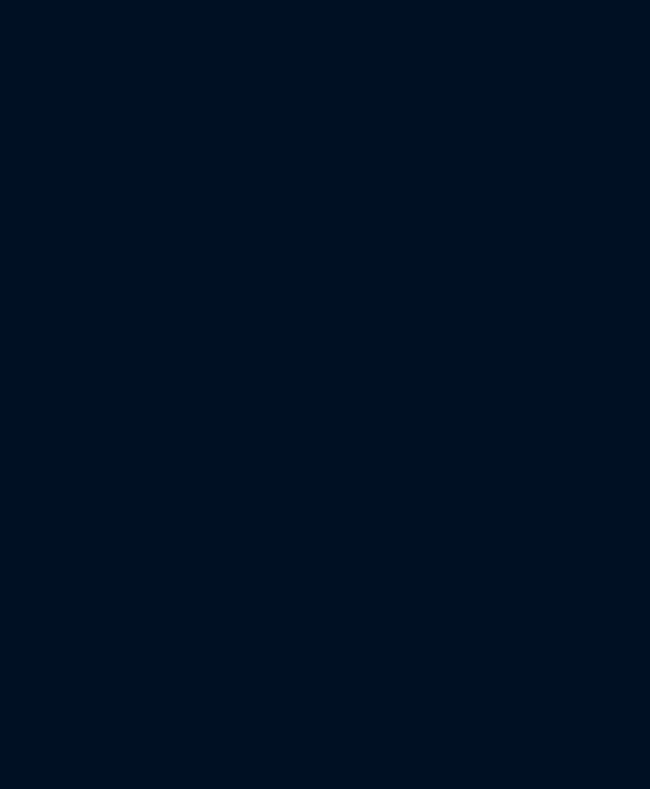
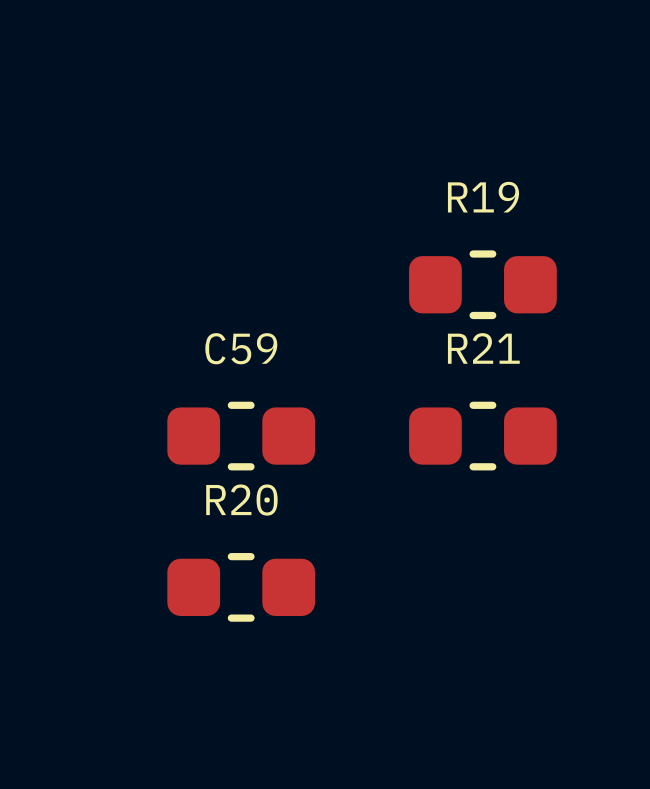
R19: none -> (482, 284)
C59: none -> (241, 436)
R21: none -> (482, 436)
R20: none -> (241, 587)

